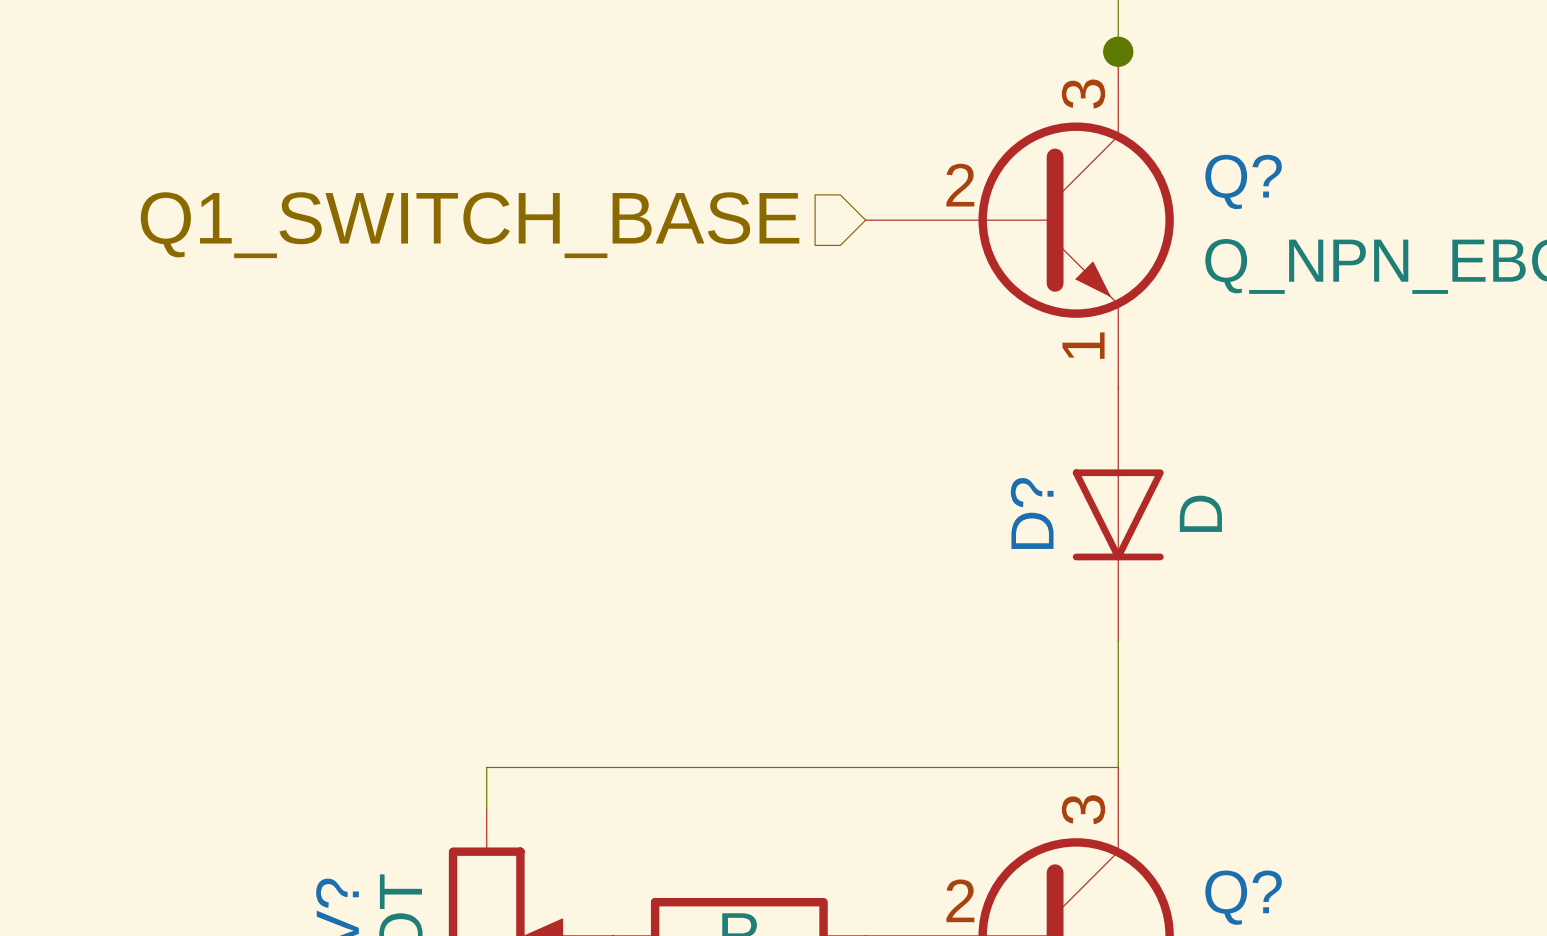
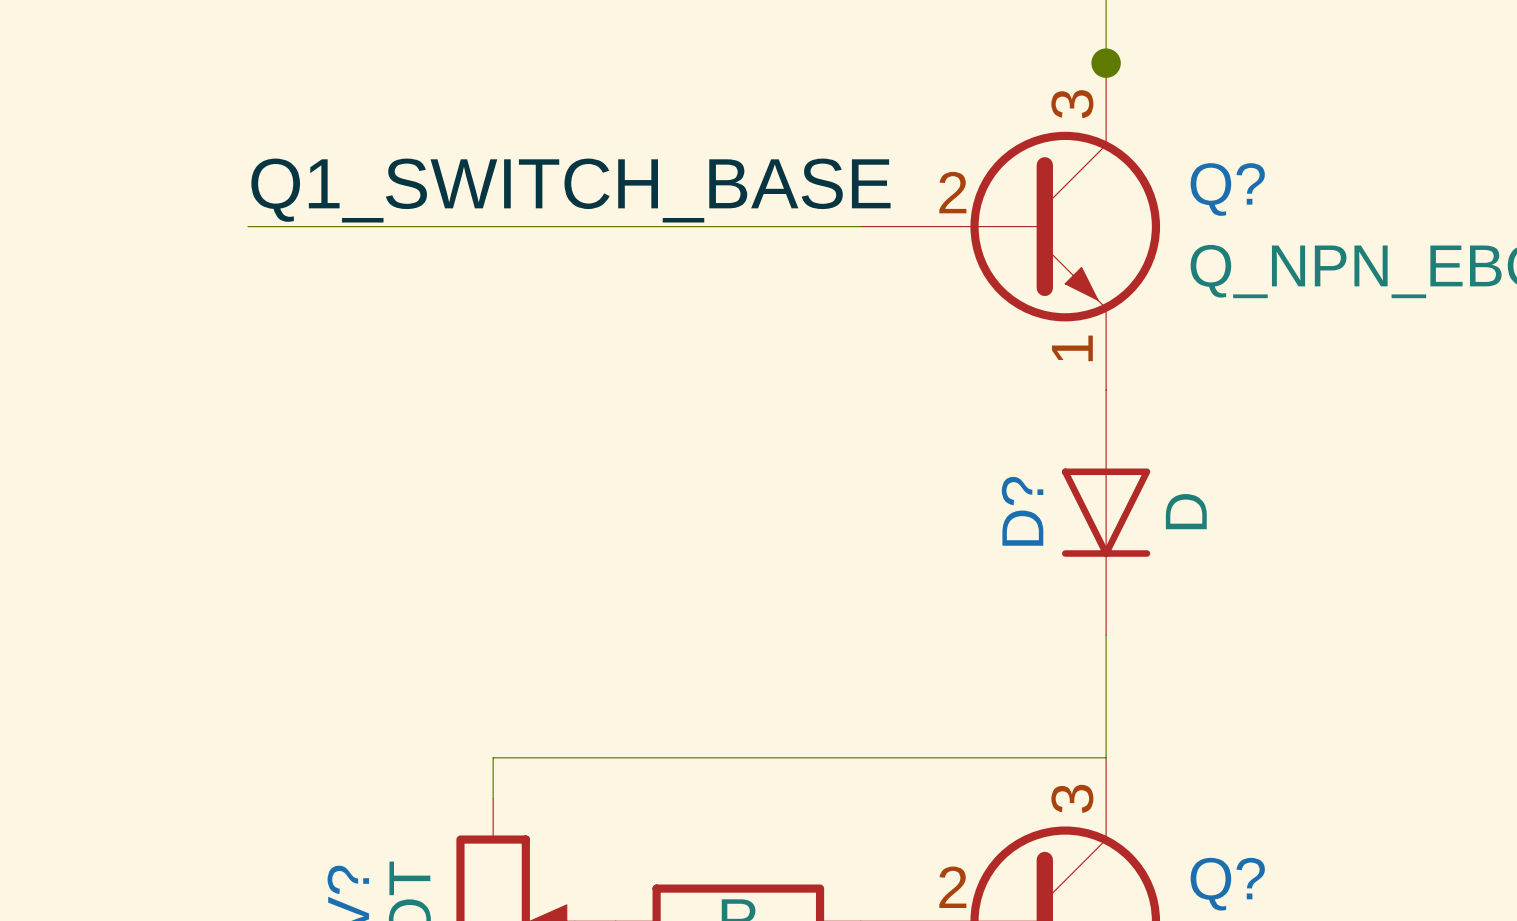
label: none -> Q1_SWITCH_BASE (570, 190)
wire: none -> (247, 226) (860, 226)
hierarchical label: Q1_SWITCH_BASE (470, 225) -> none

